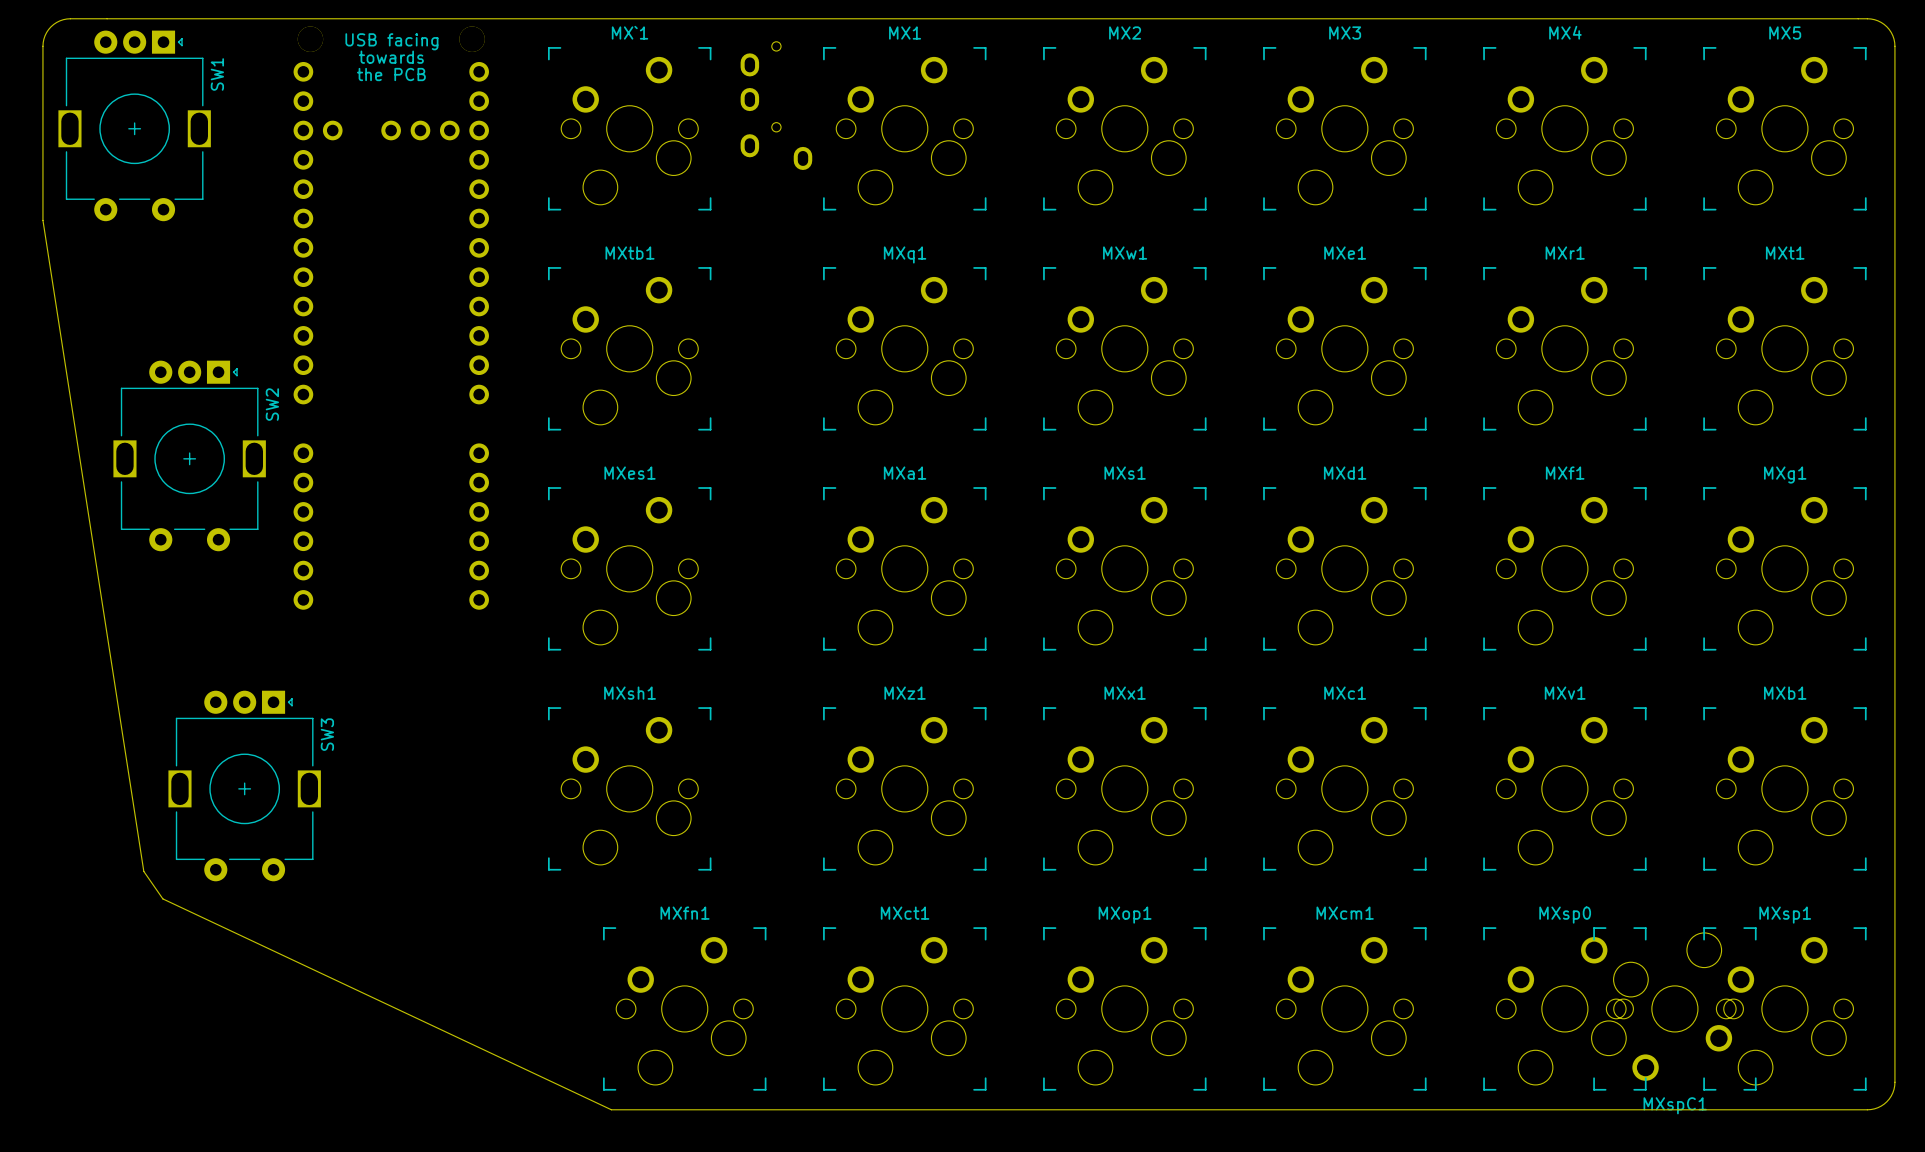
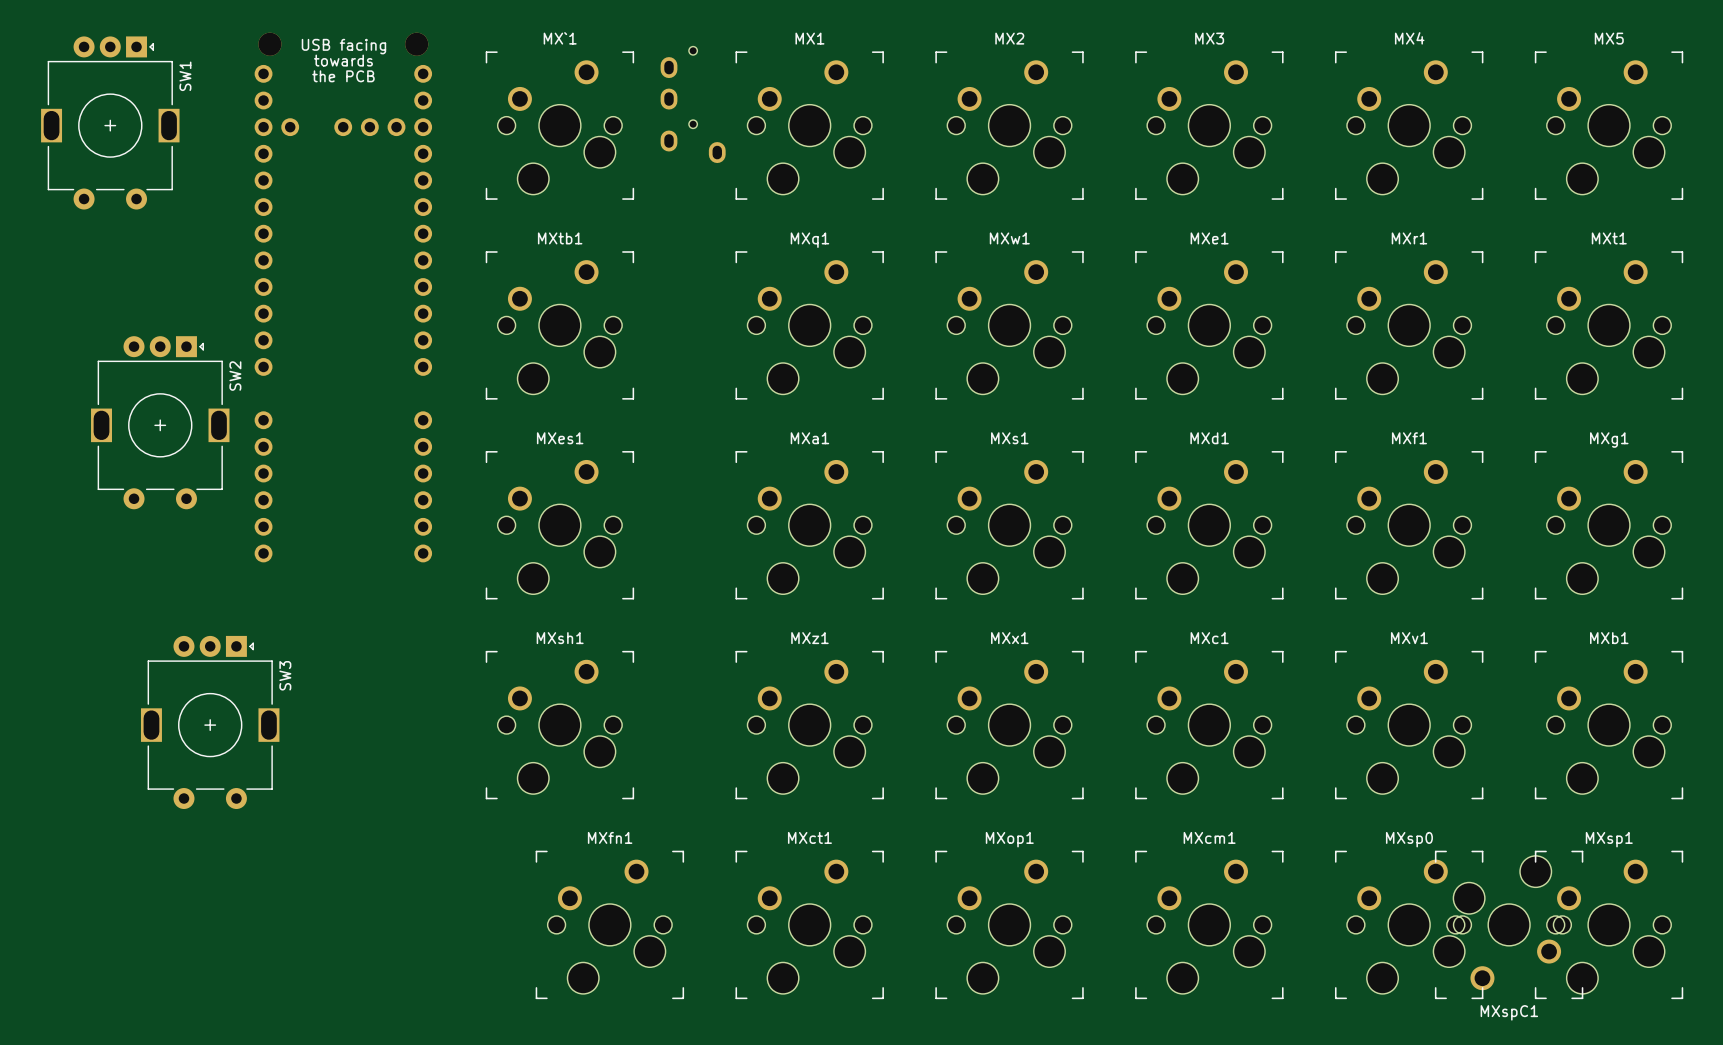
board edge: (70, 18) (1867, 18) (1881, 22) (1891, 32) (1894, 46) (1894, 1082) (1891, 1096) (1881, 1106) (1867, 1109) (611, 1109) (162, 898) (143, 871) (42, 220) (43, 42) (51, 26) (59, 20) (70, 18) -> none

